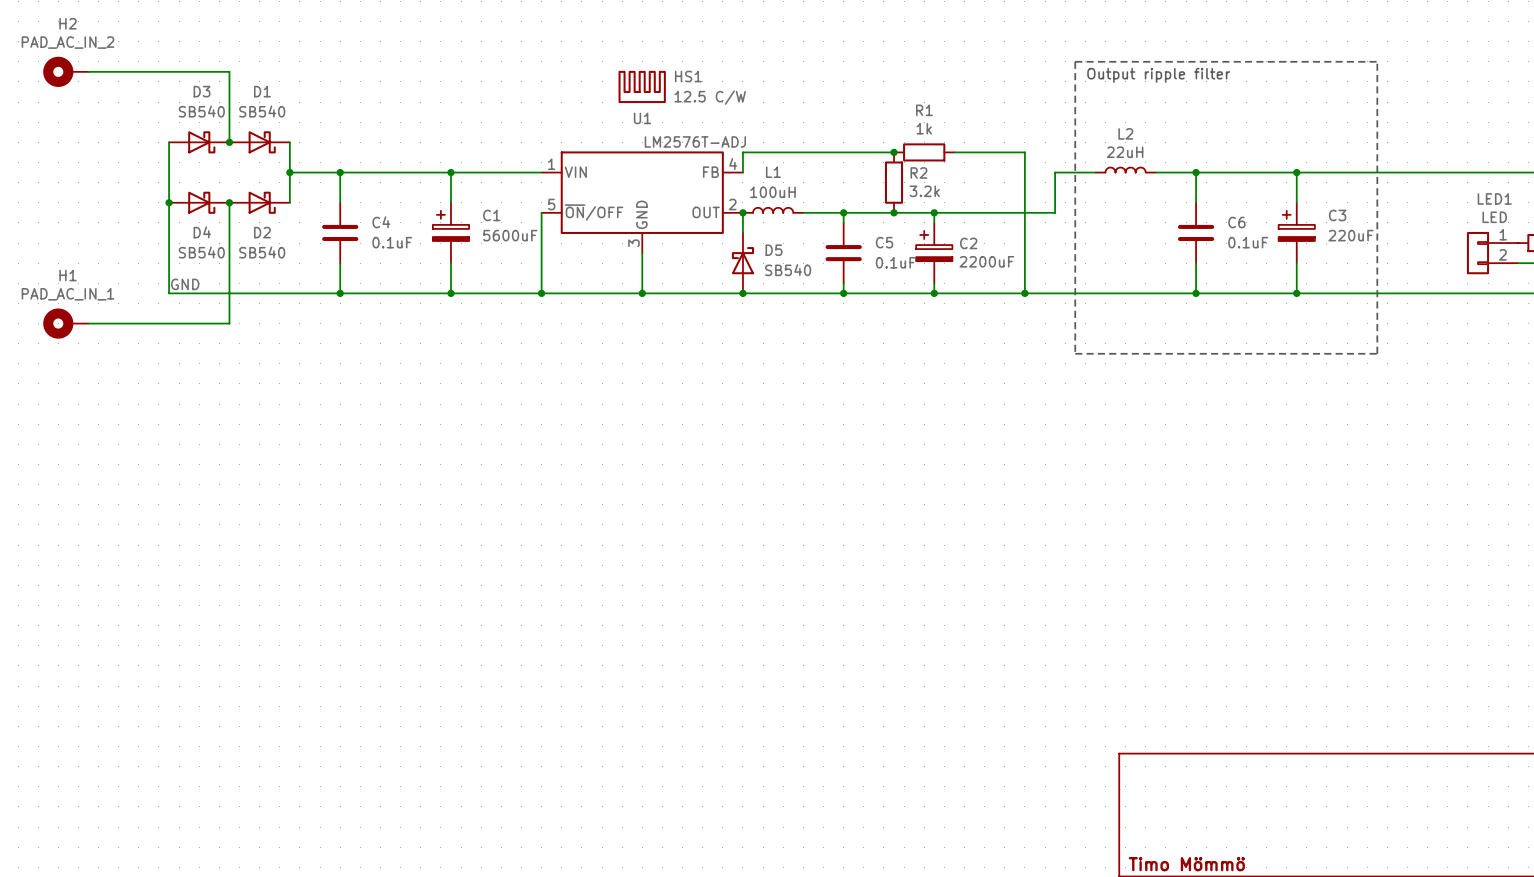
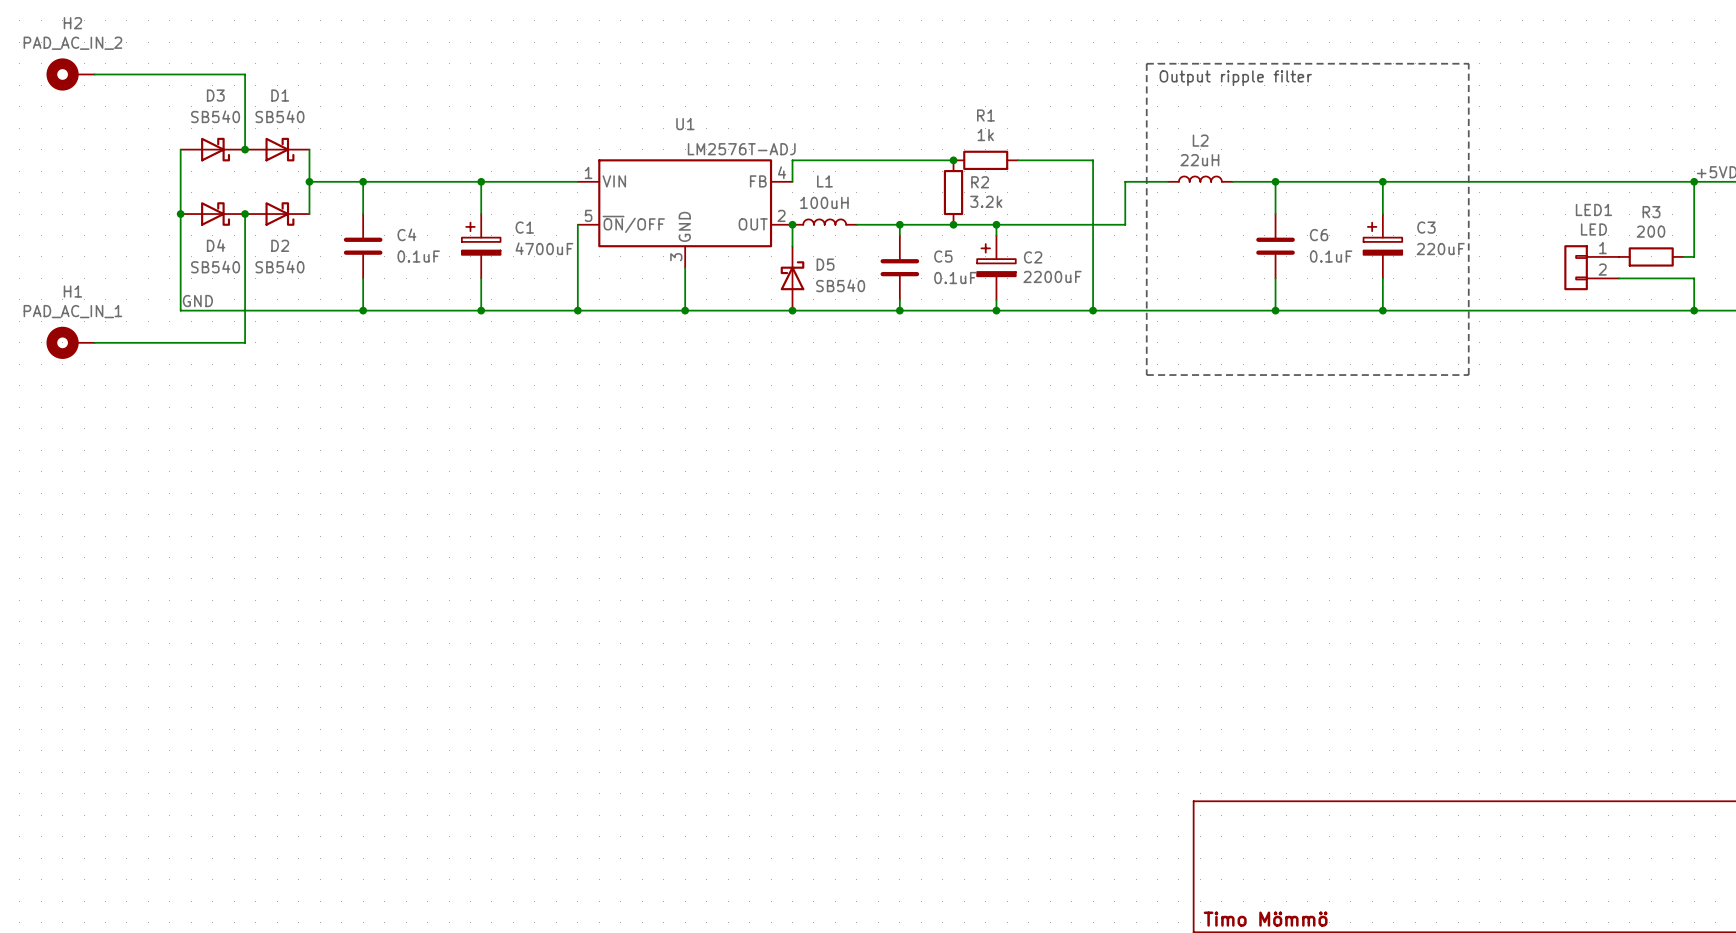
HS1: 12.5 C/W (642, 86) -> none
C1 value: 5600uF (510, 235) -> 4700uF (544, 248)

